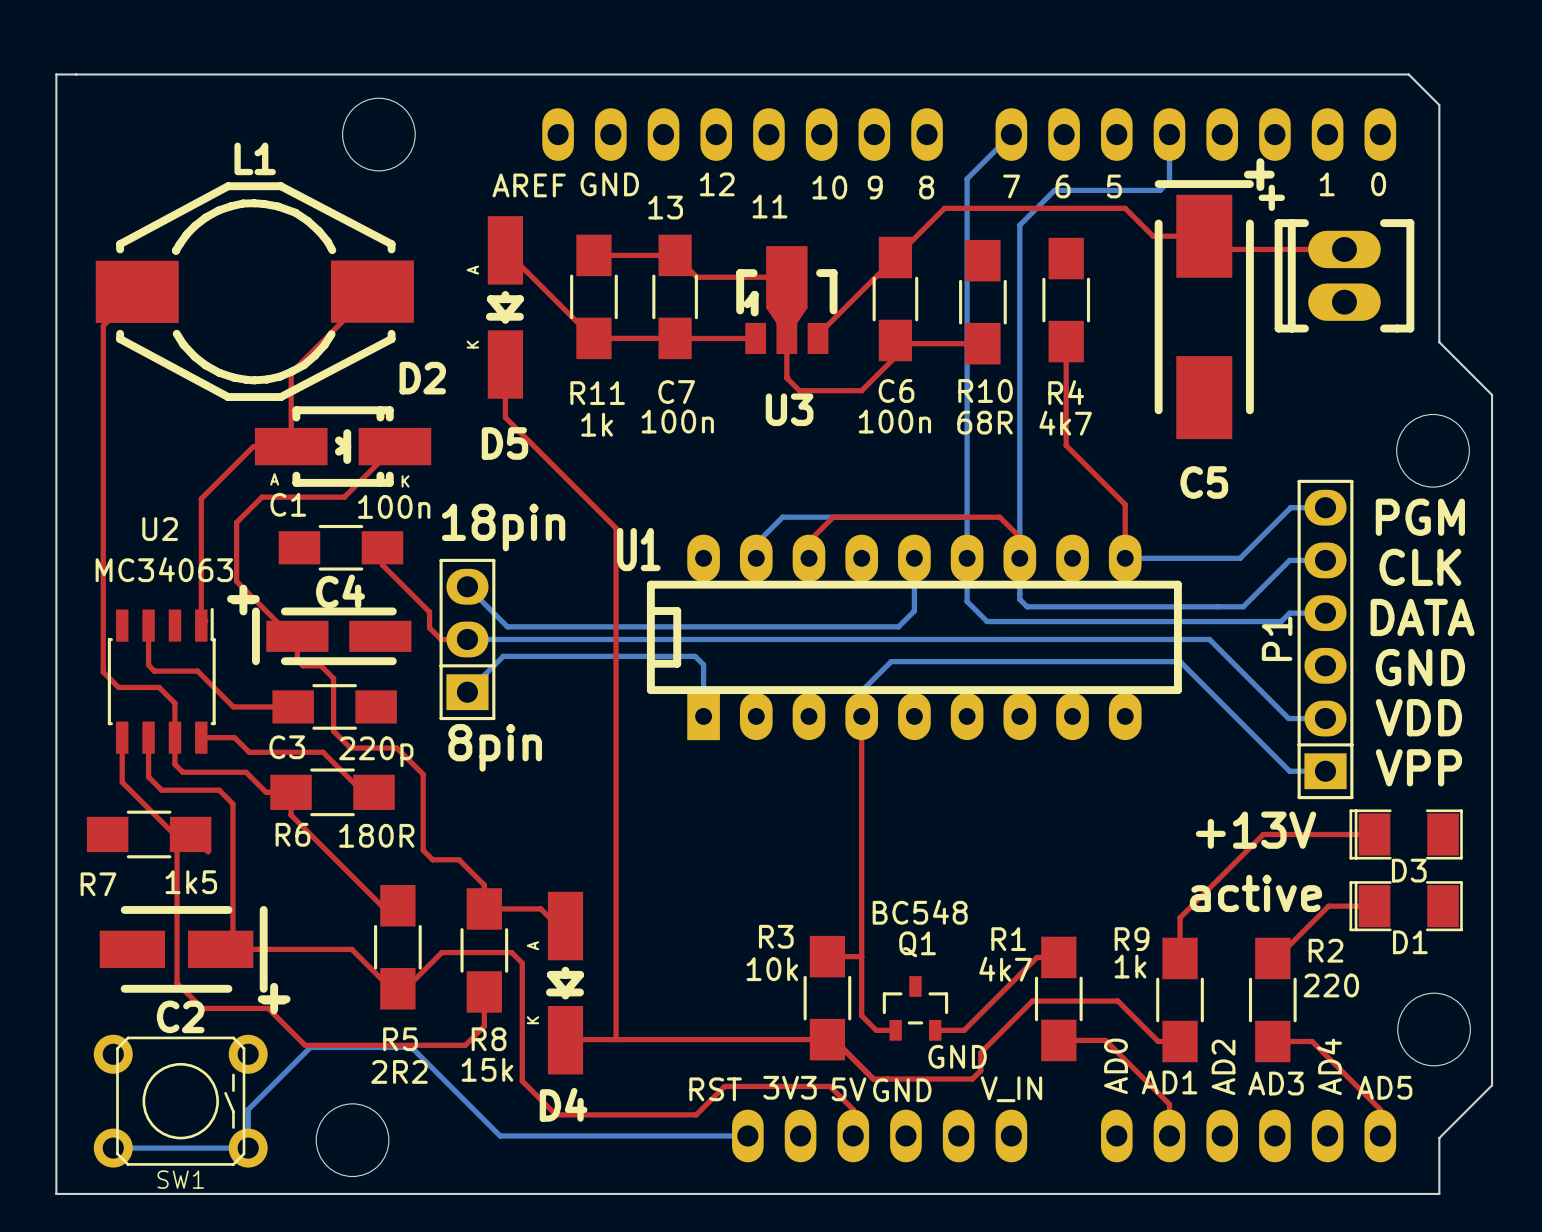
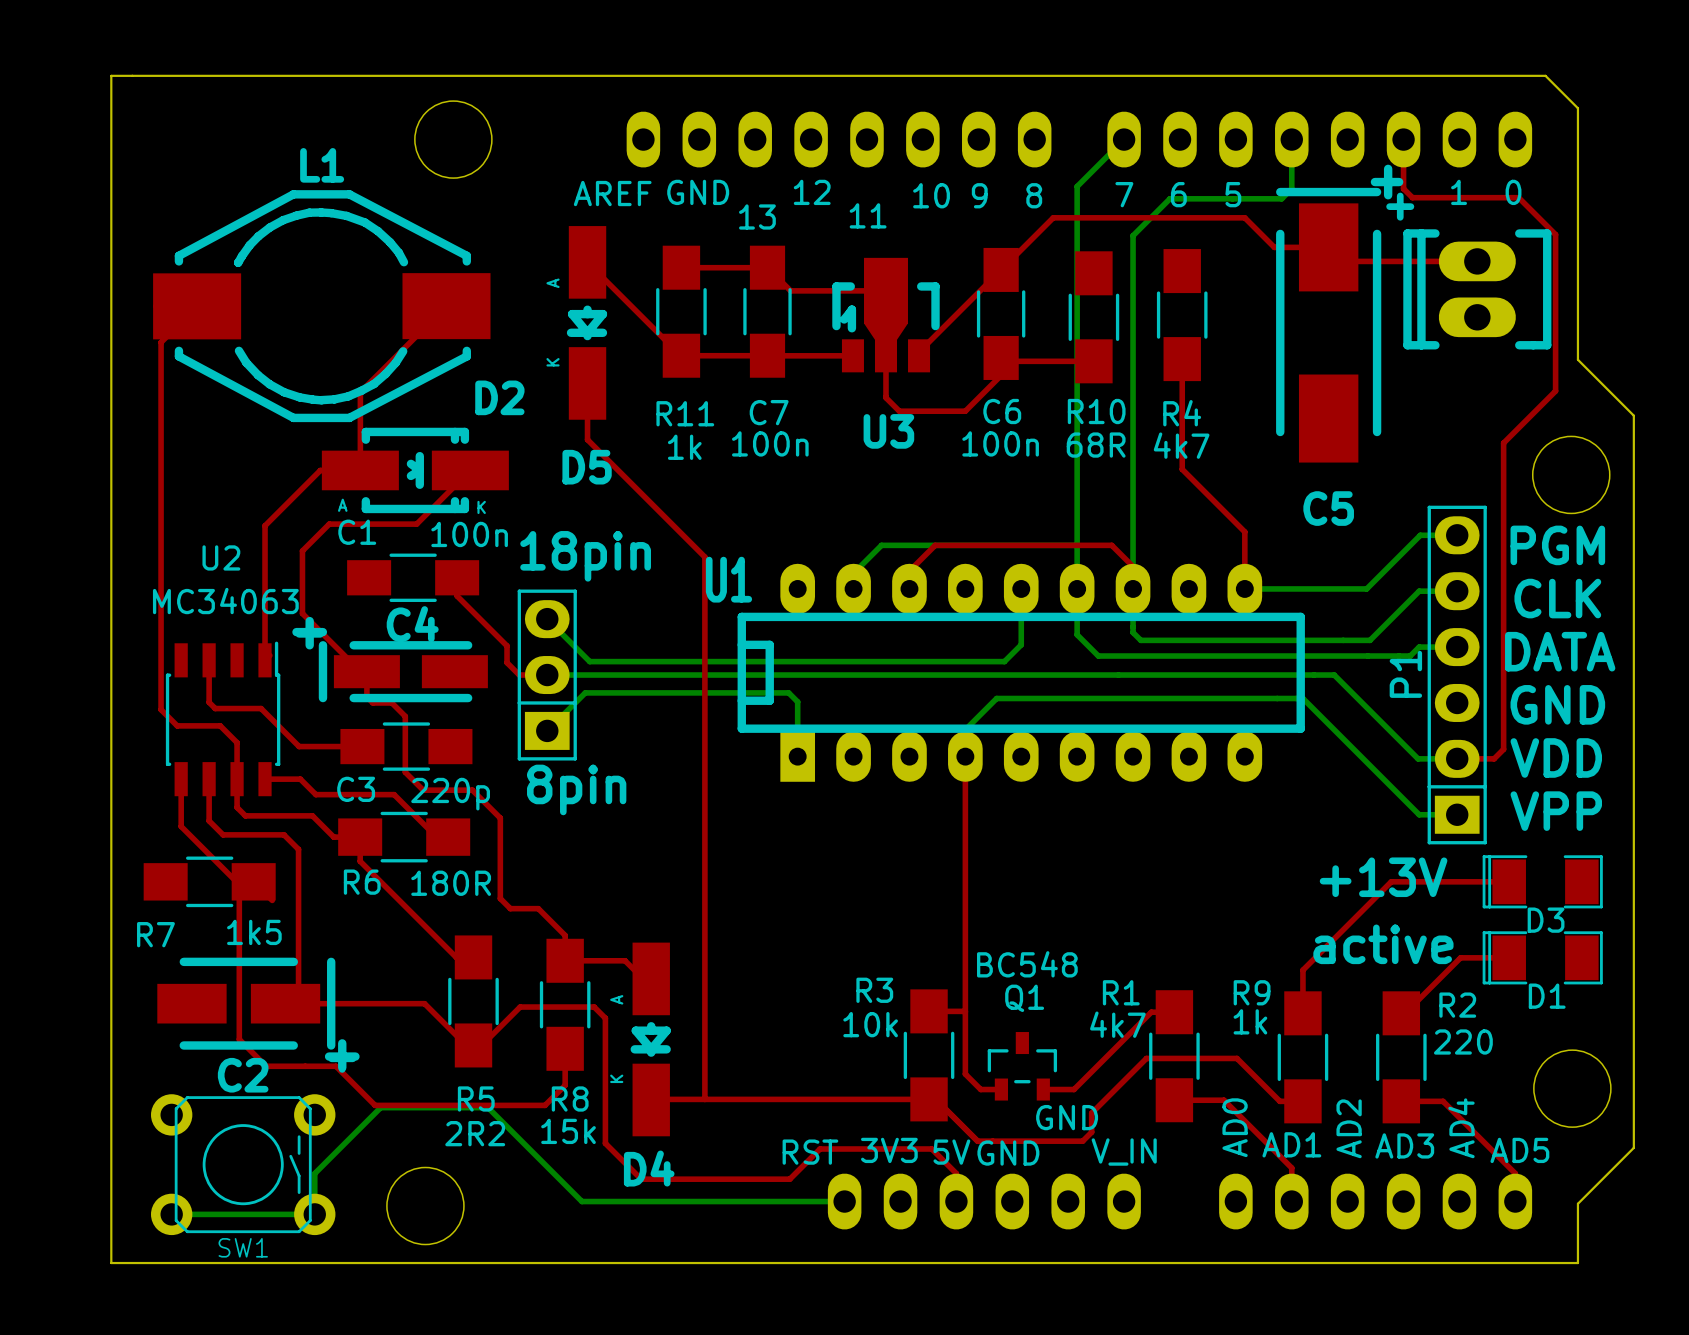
top track: none -> (1403, 139) (1403, 188) (1412, 197) (1518, 197) (1555, 234) (1555, 391) (1503, 443) (1503, 749) (1494, 758) (1457, 758)

